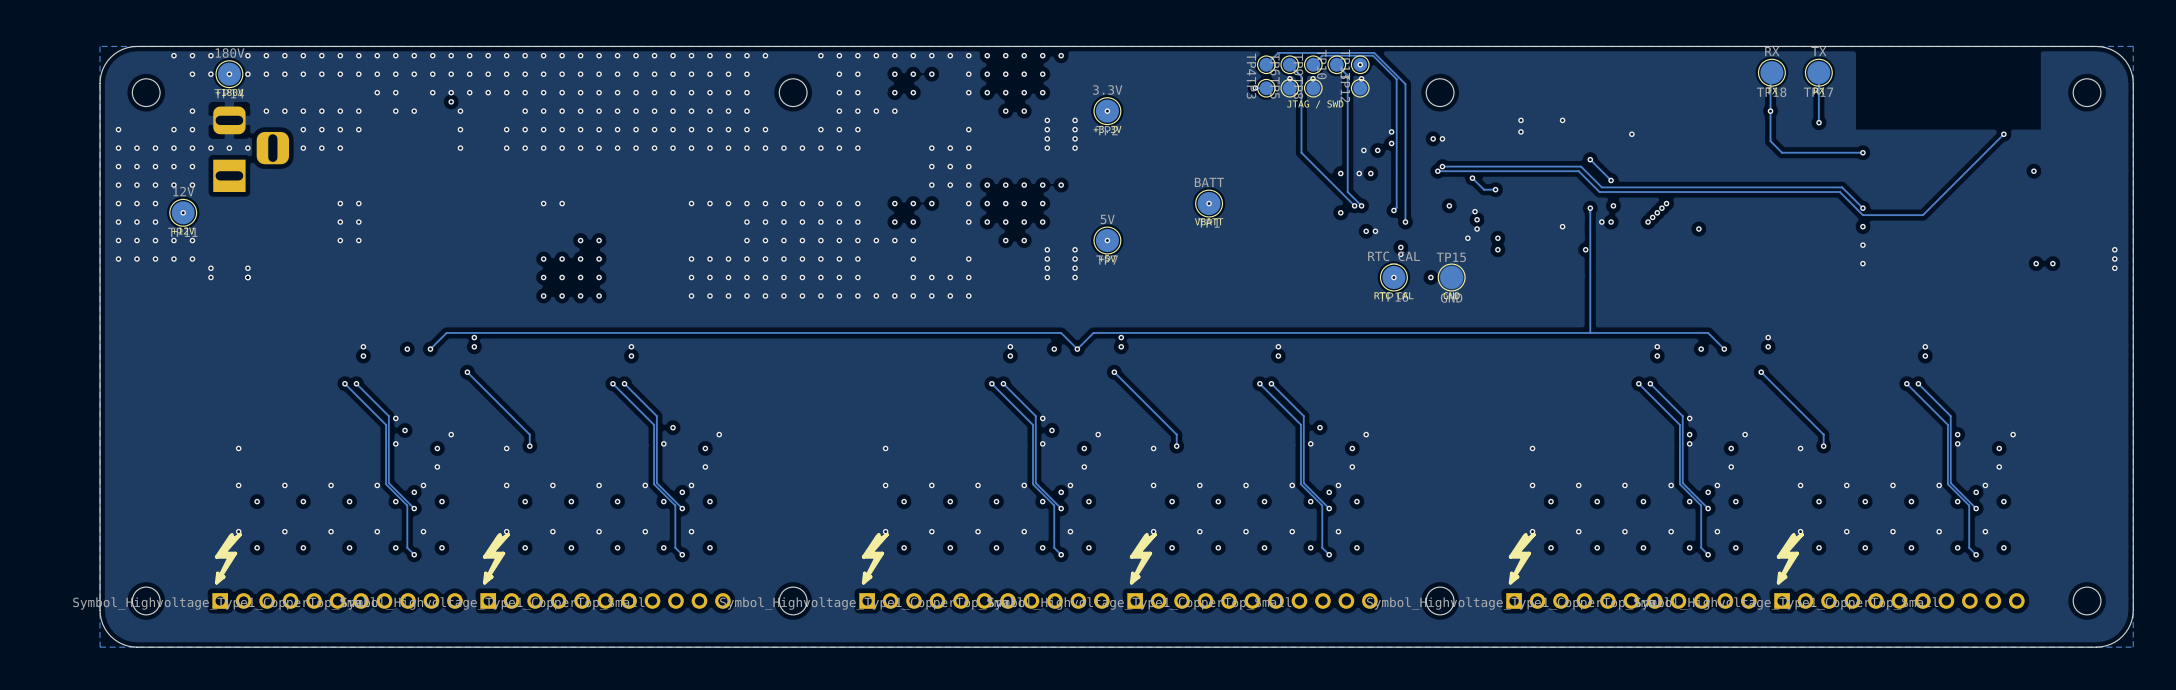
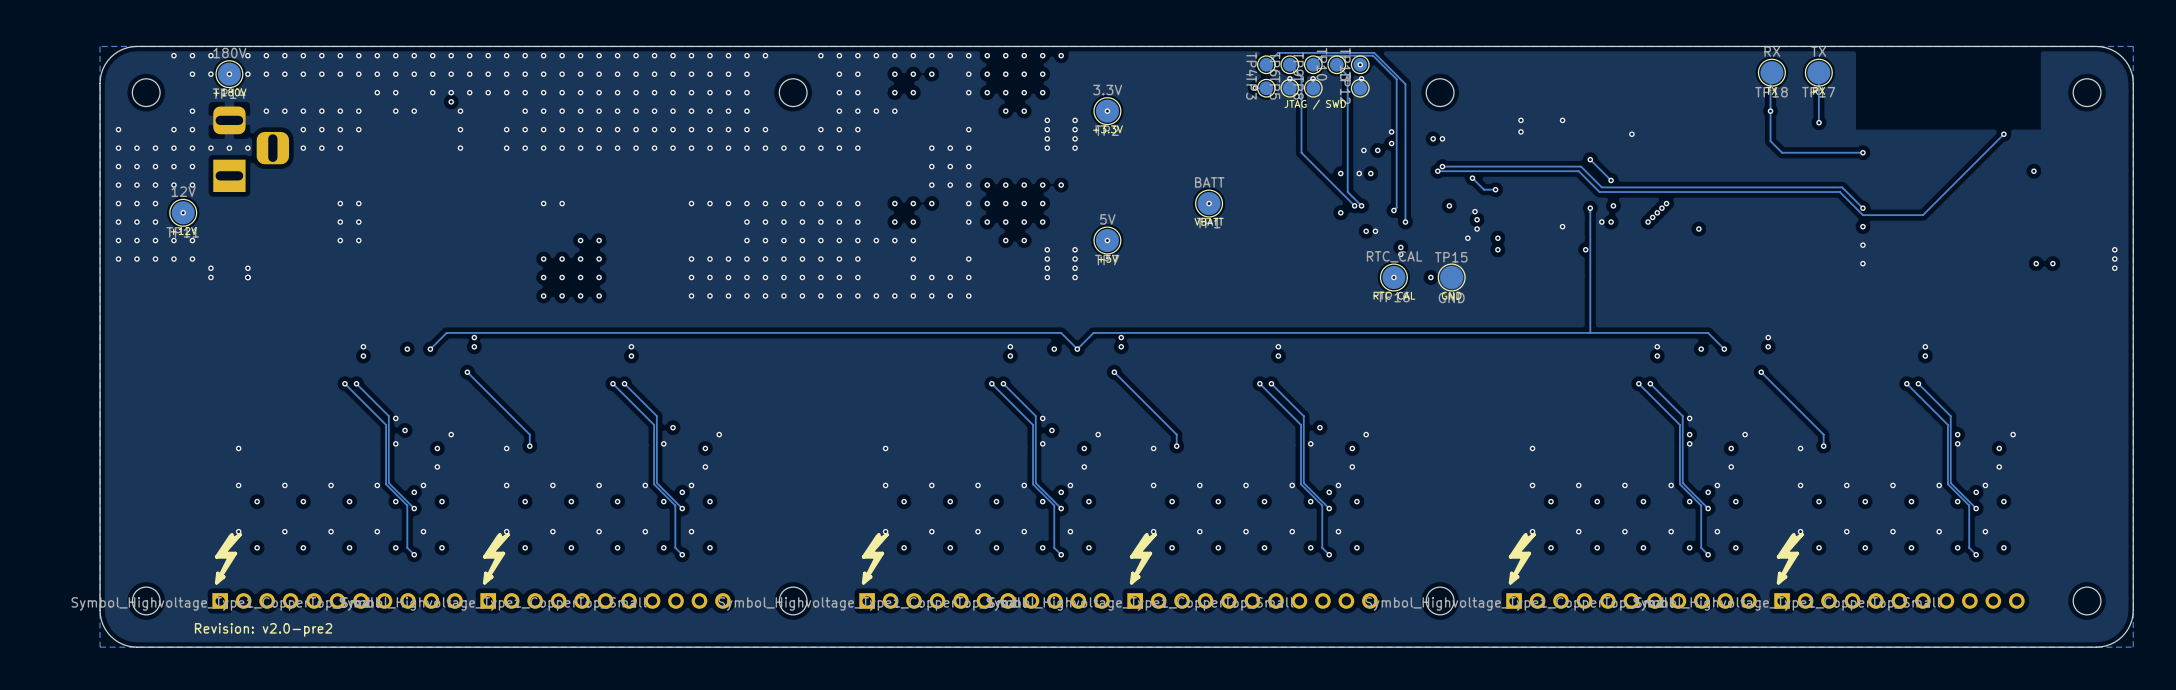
text: none -> Revision: v2.0-pre2 (263, 629)

